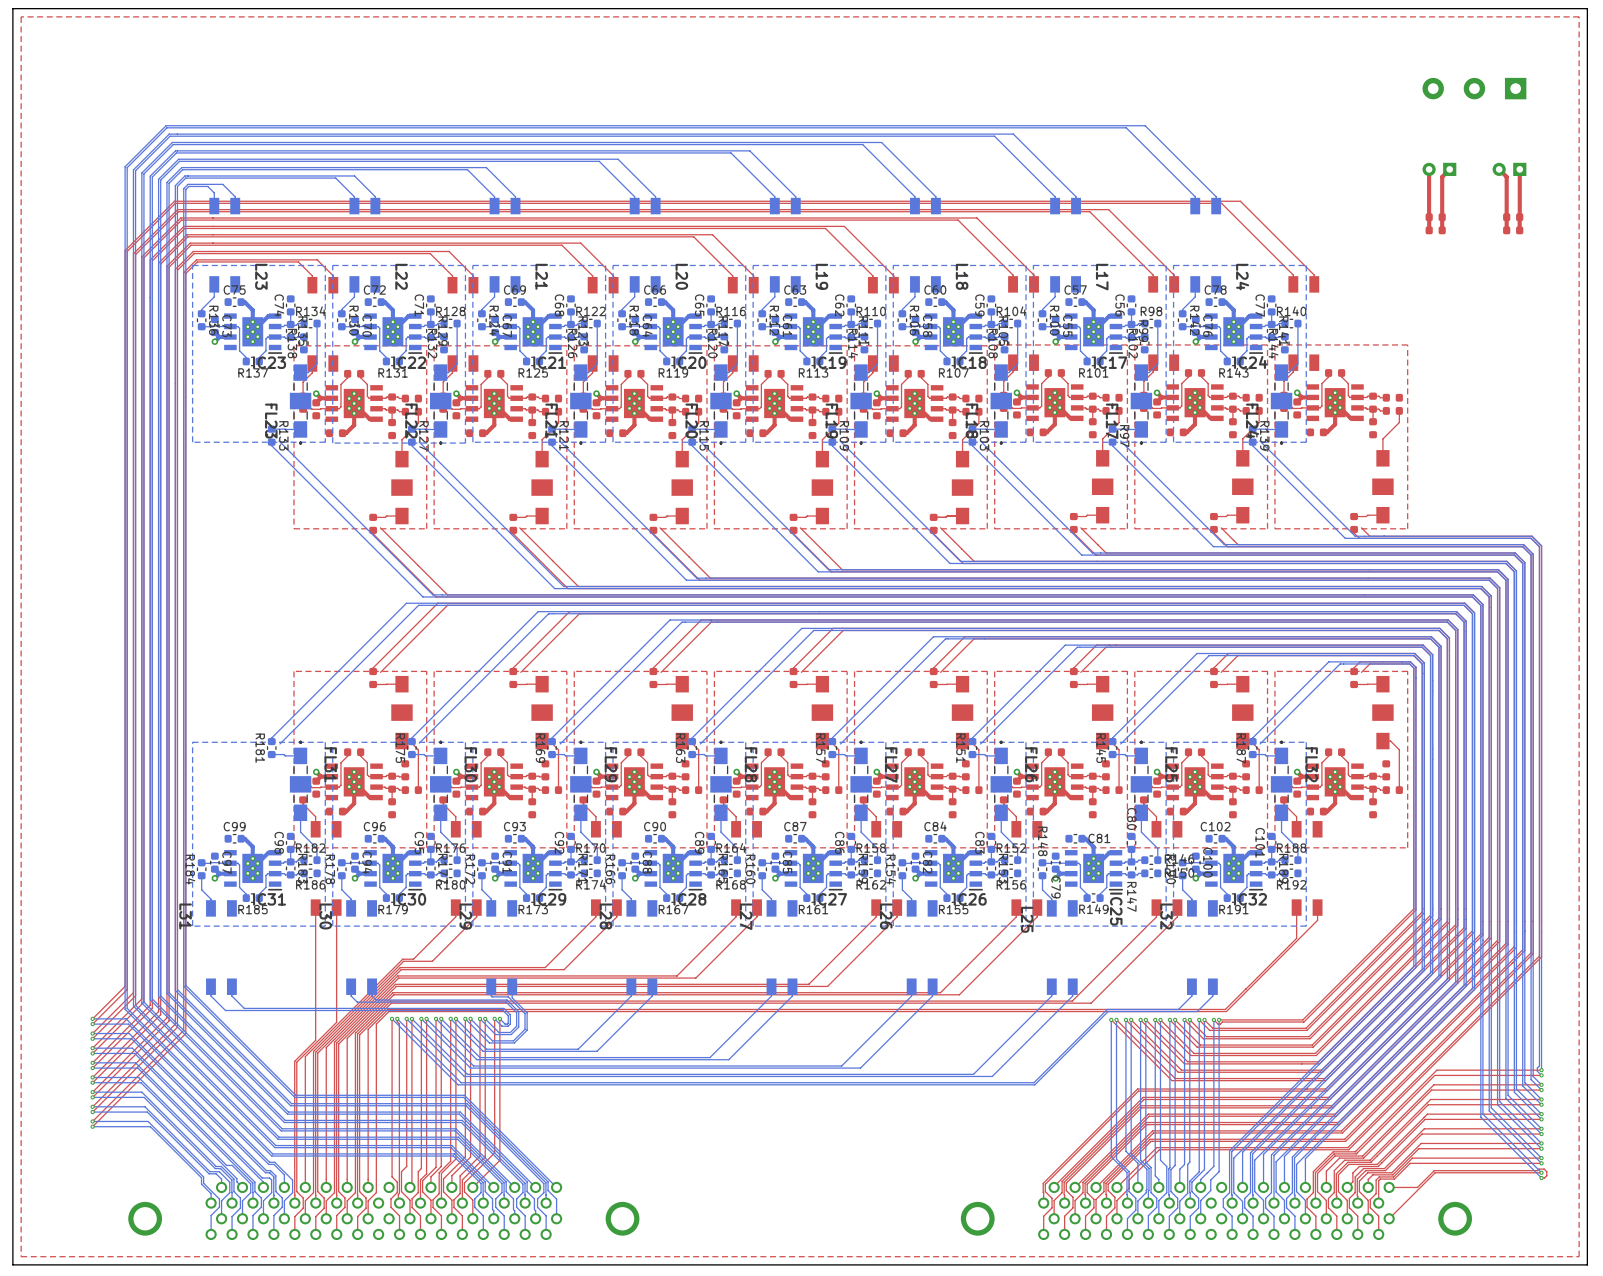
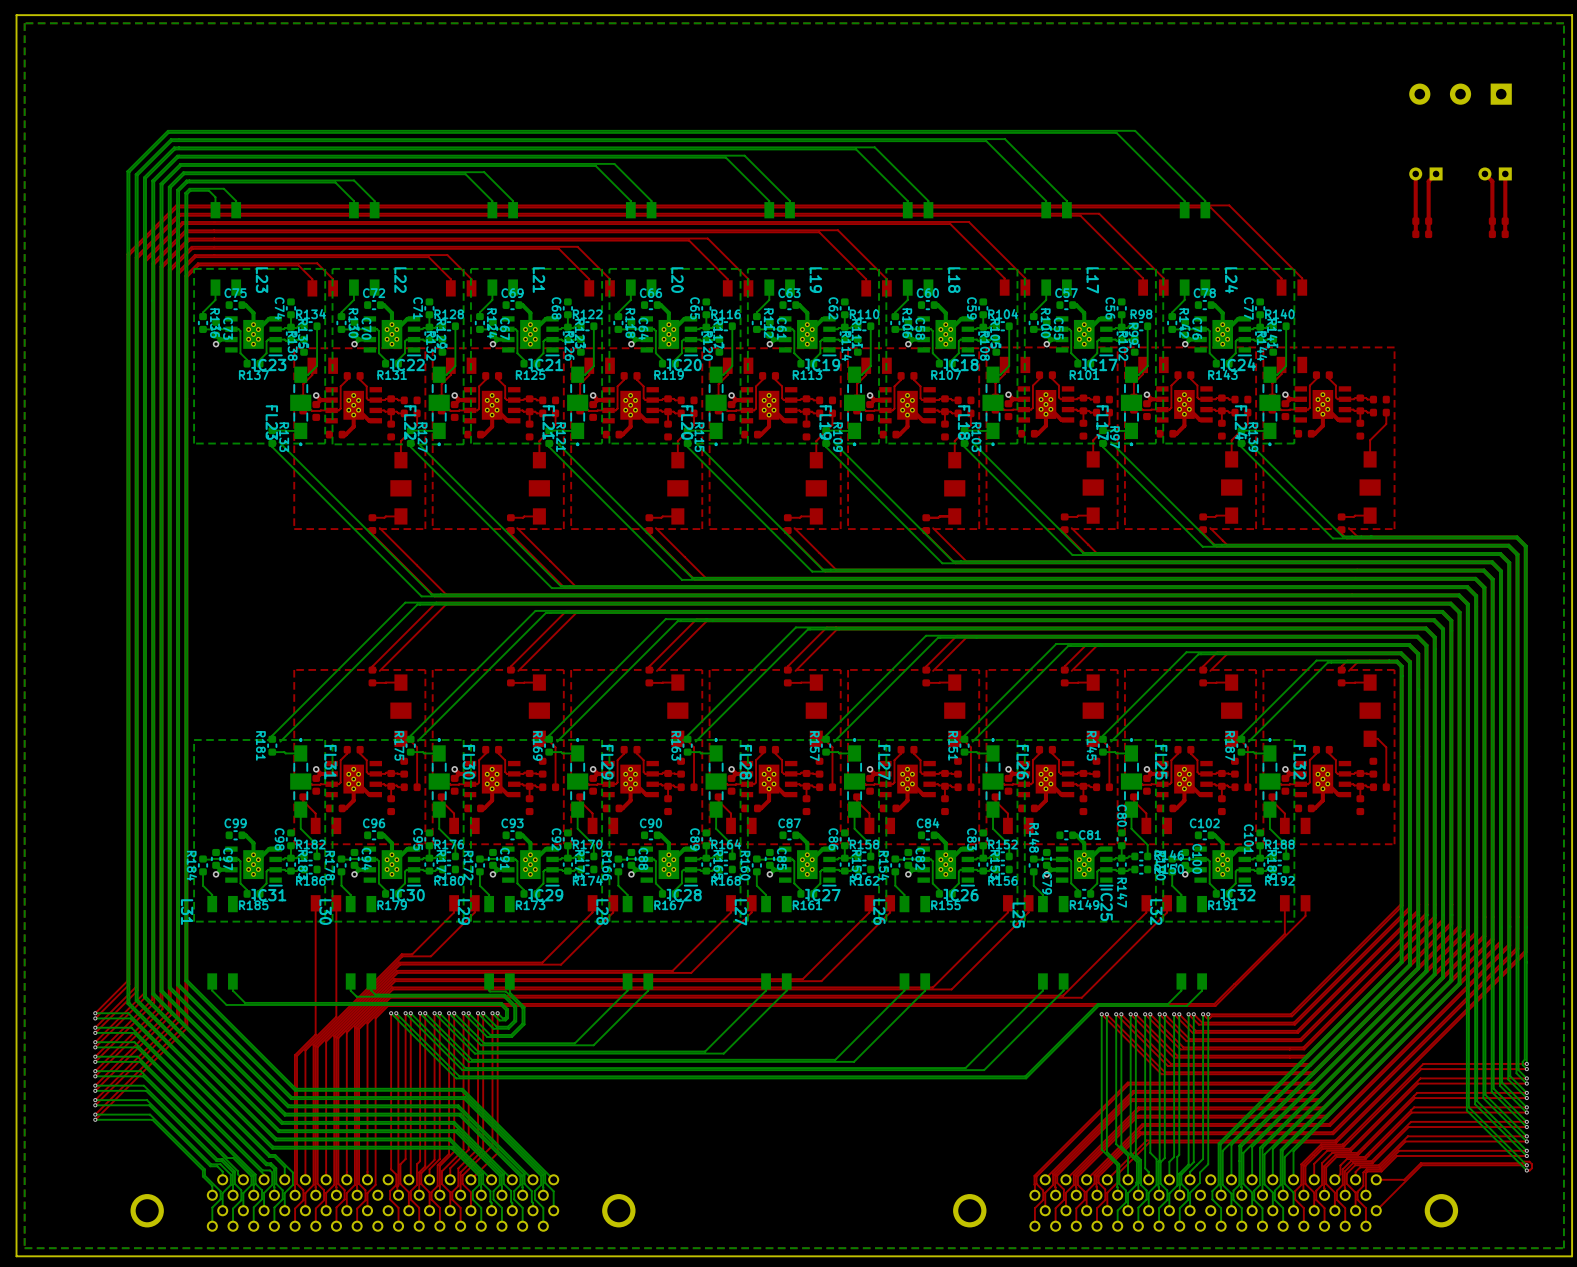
bottom zone outline: none -> (1563, 23) (1563, 1248) (24, 1248) (24, 23) (1563, 23)

